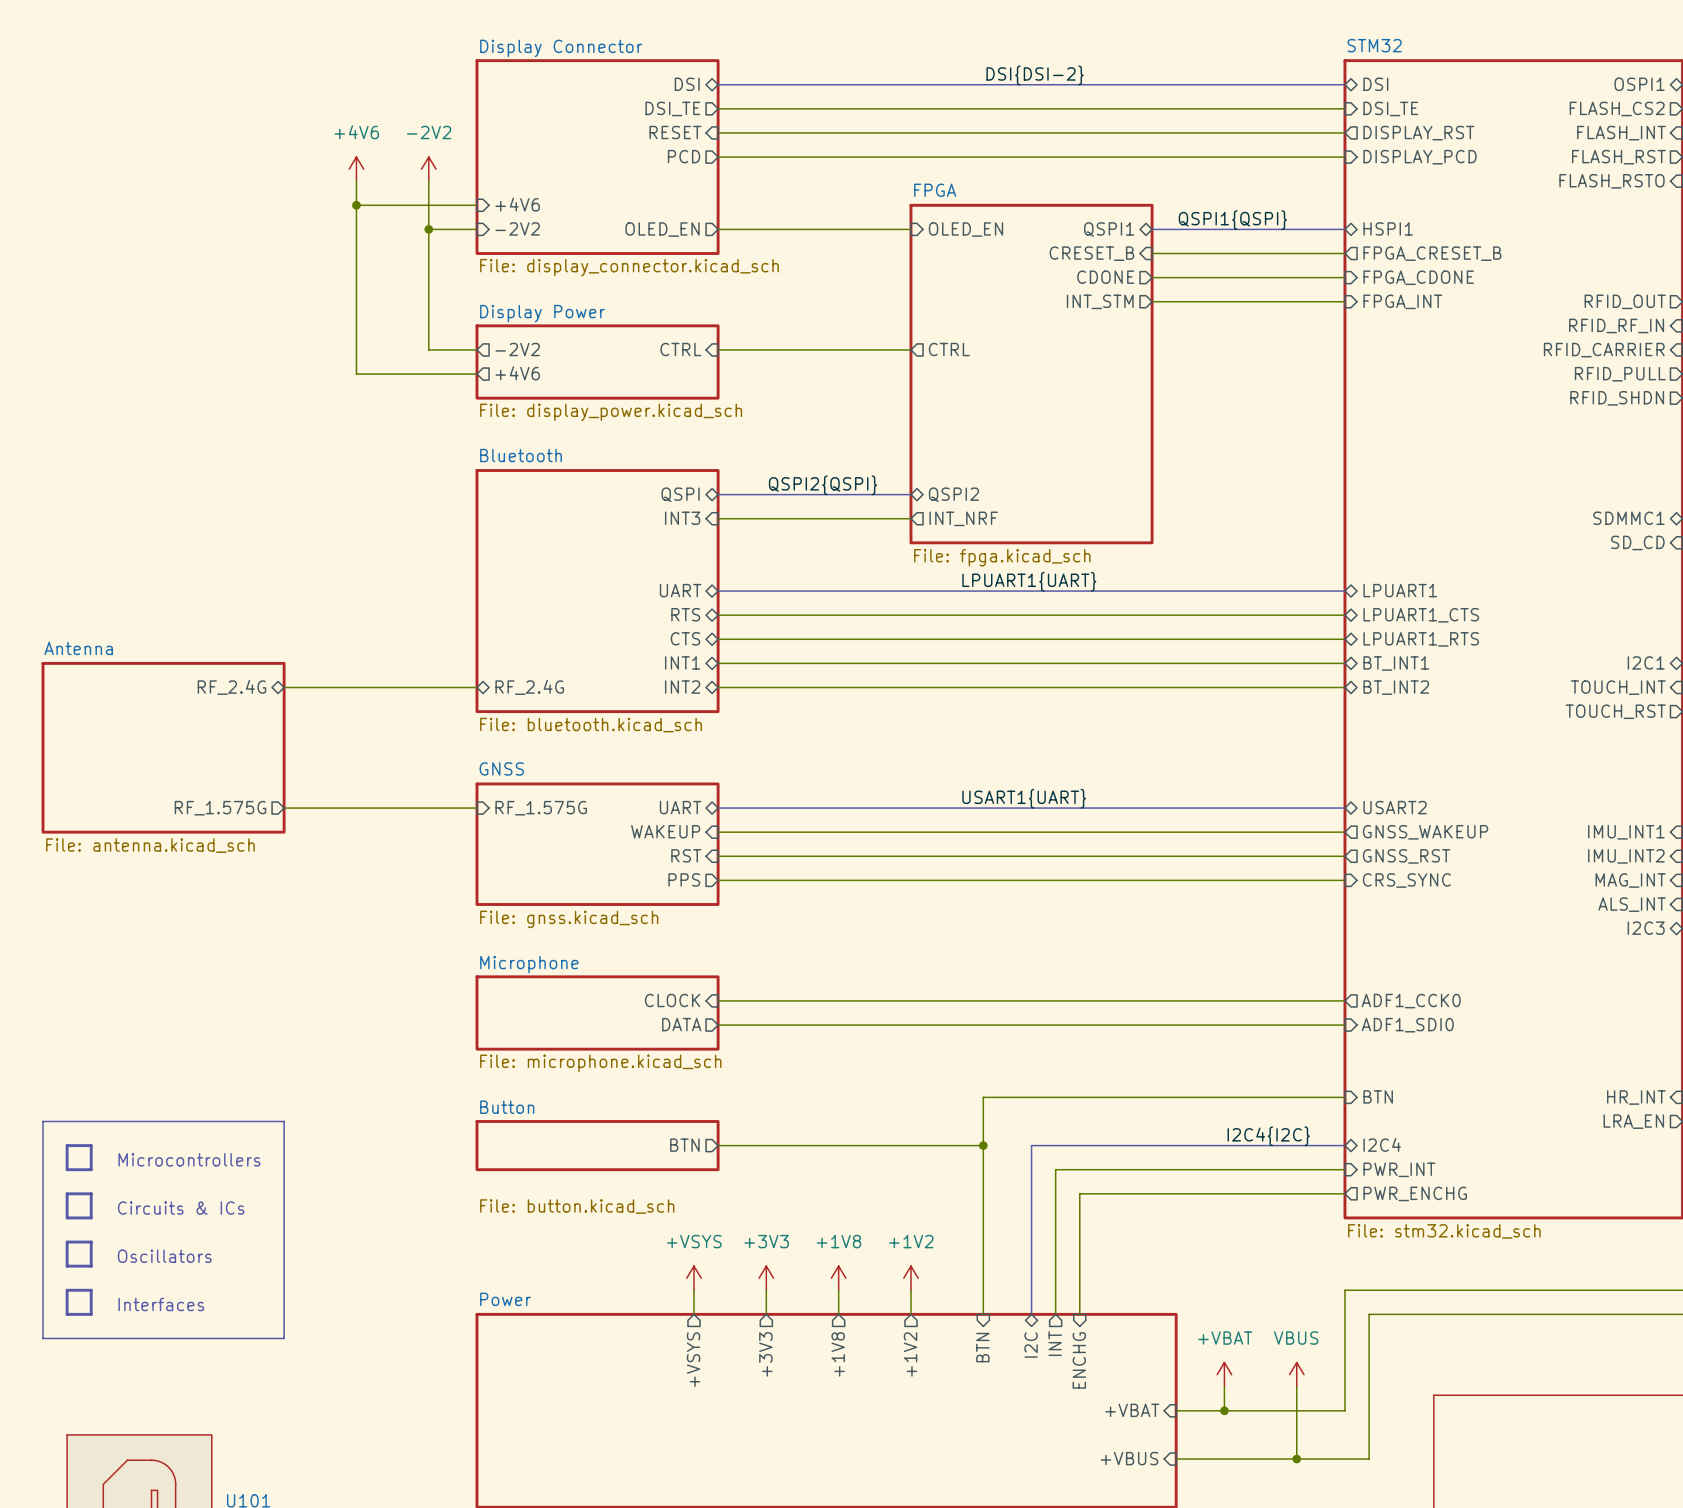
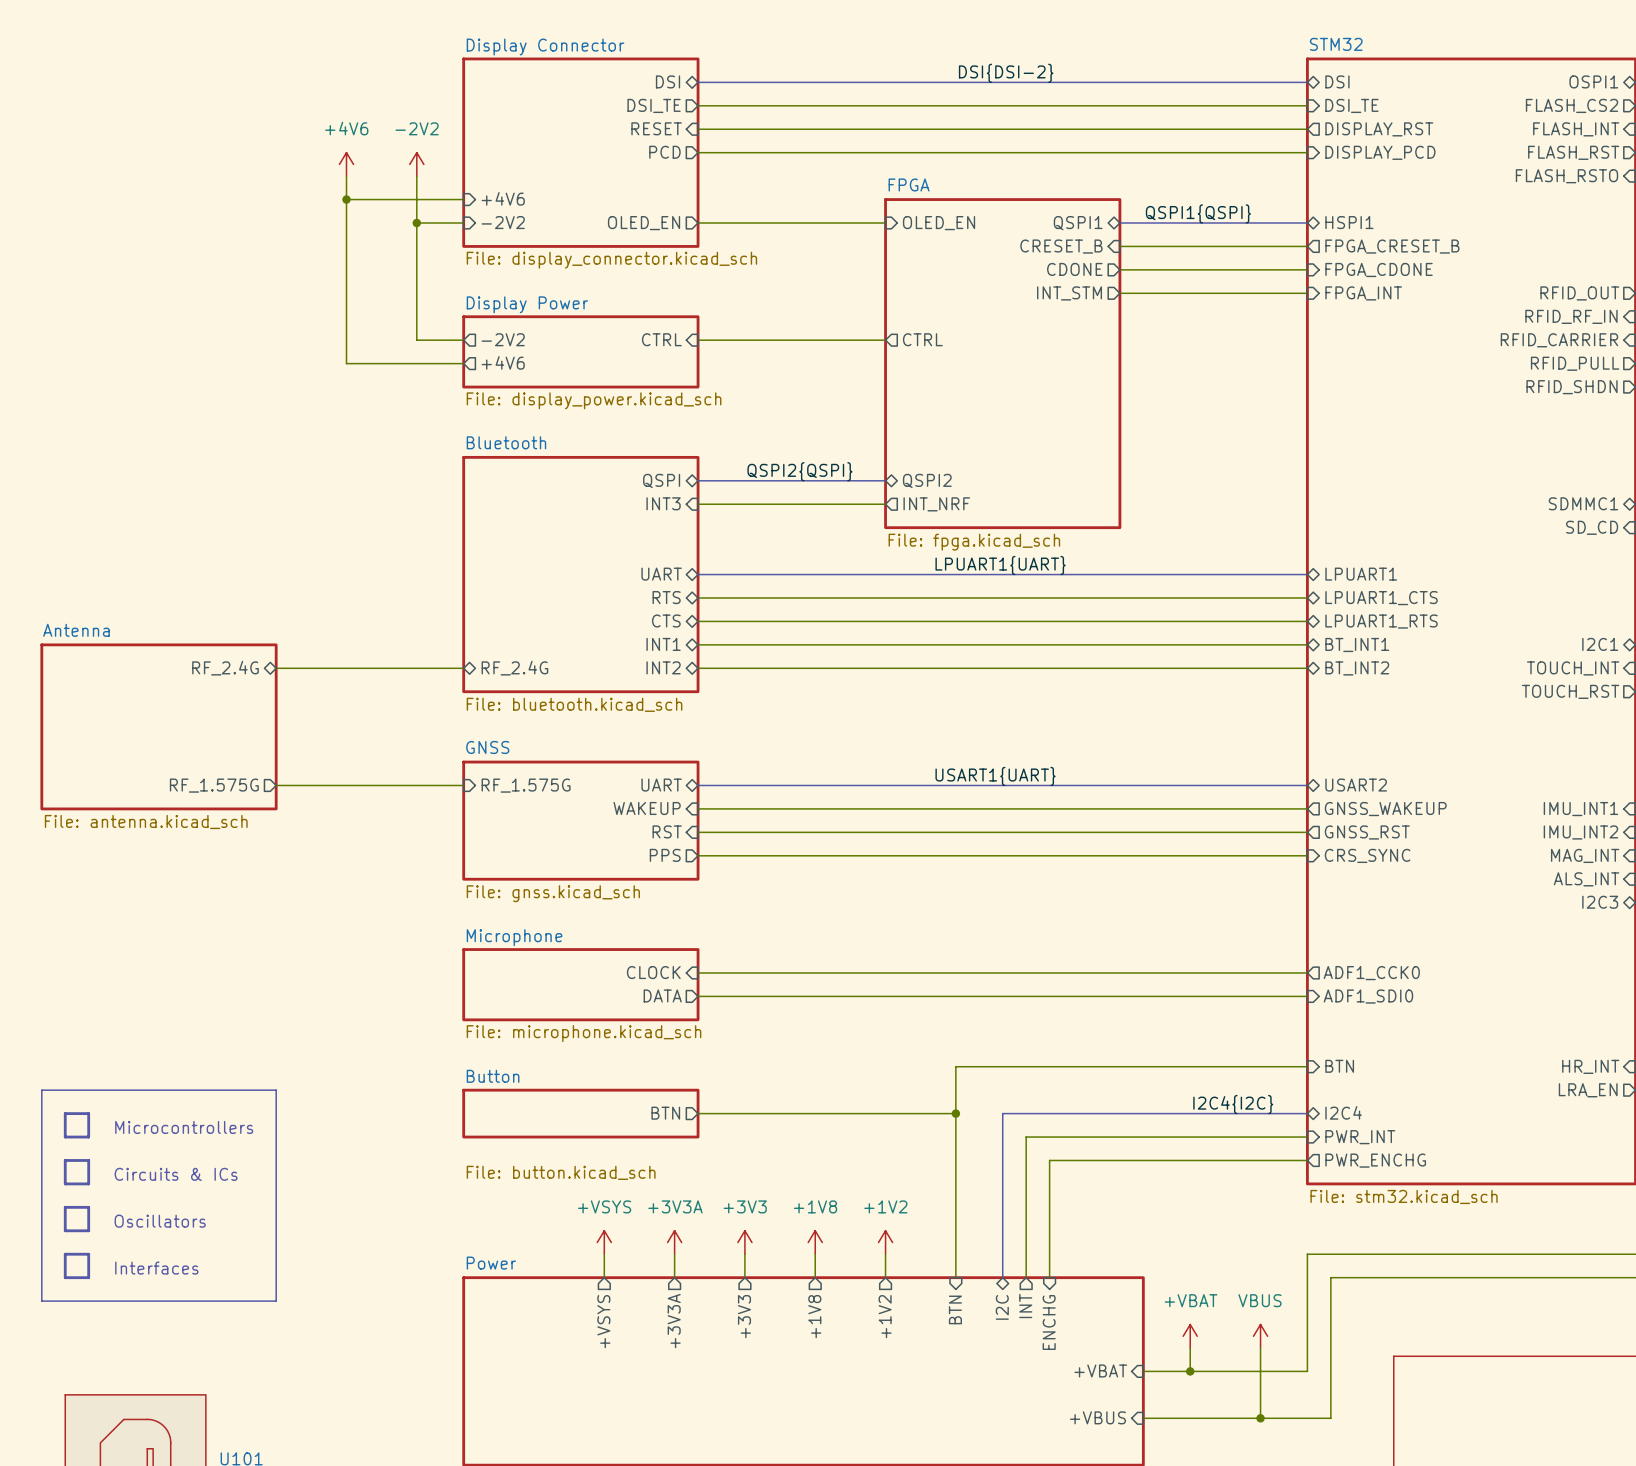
power symbol: none -> +VSYS (604, 1242)
power symbol: +VSYS (693, 1278) -> +3V3A (674, 1242)
wire: none -> (604, 1254) (604, 1277)
sheet pin: none -> +VSYS (603, 1321)
sheet pin: +VSYS (693, 1359) -> +3V3A (674, 1321)

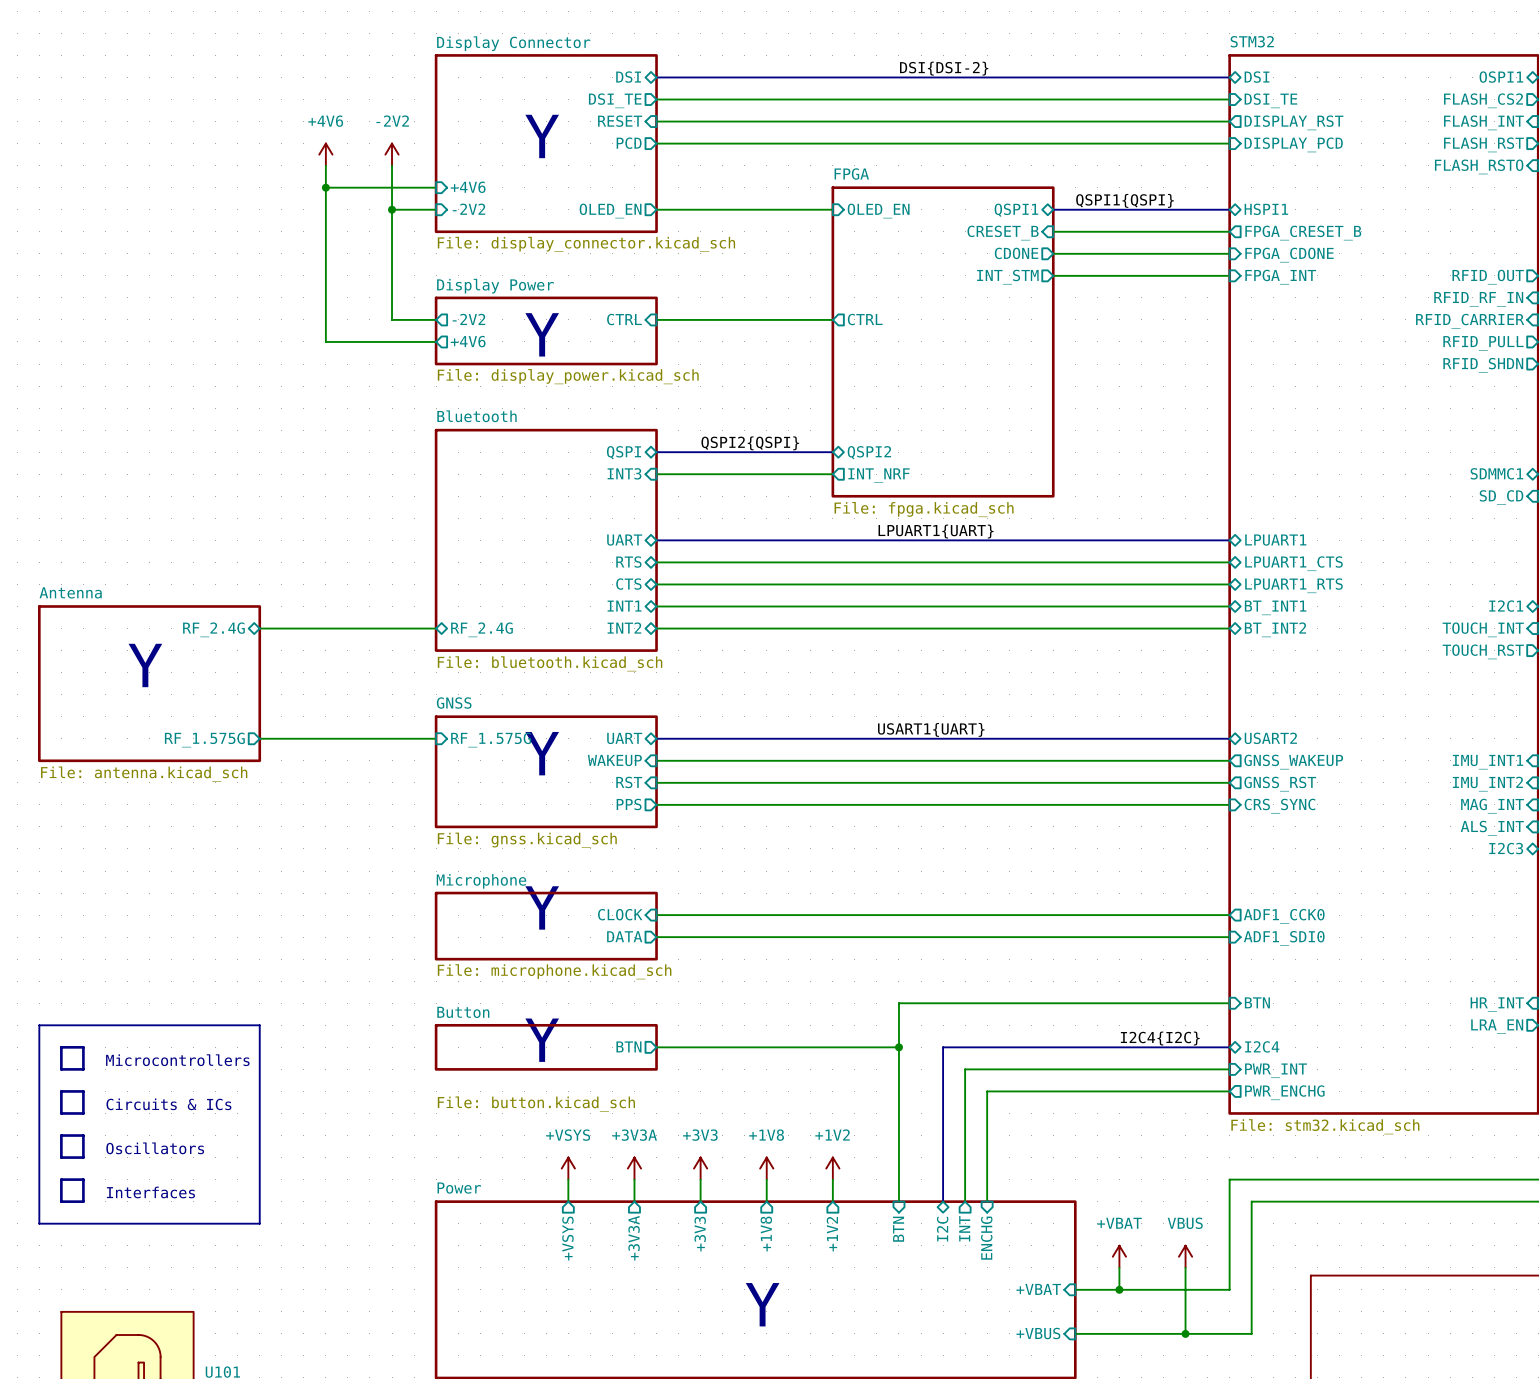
text: none -> Y (542, 136)
text: none -> Y (542, 334)
text: none -> Y (145, 665)
text: none -> Y (542, 753)
text: none -> Y (542, 907)
text: none -> Y (542, 1040)
text: none -> Y (762, 1304)

